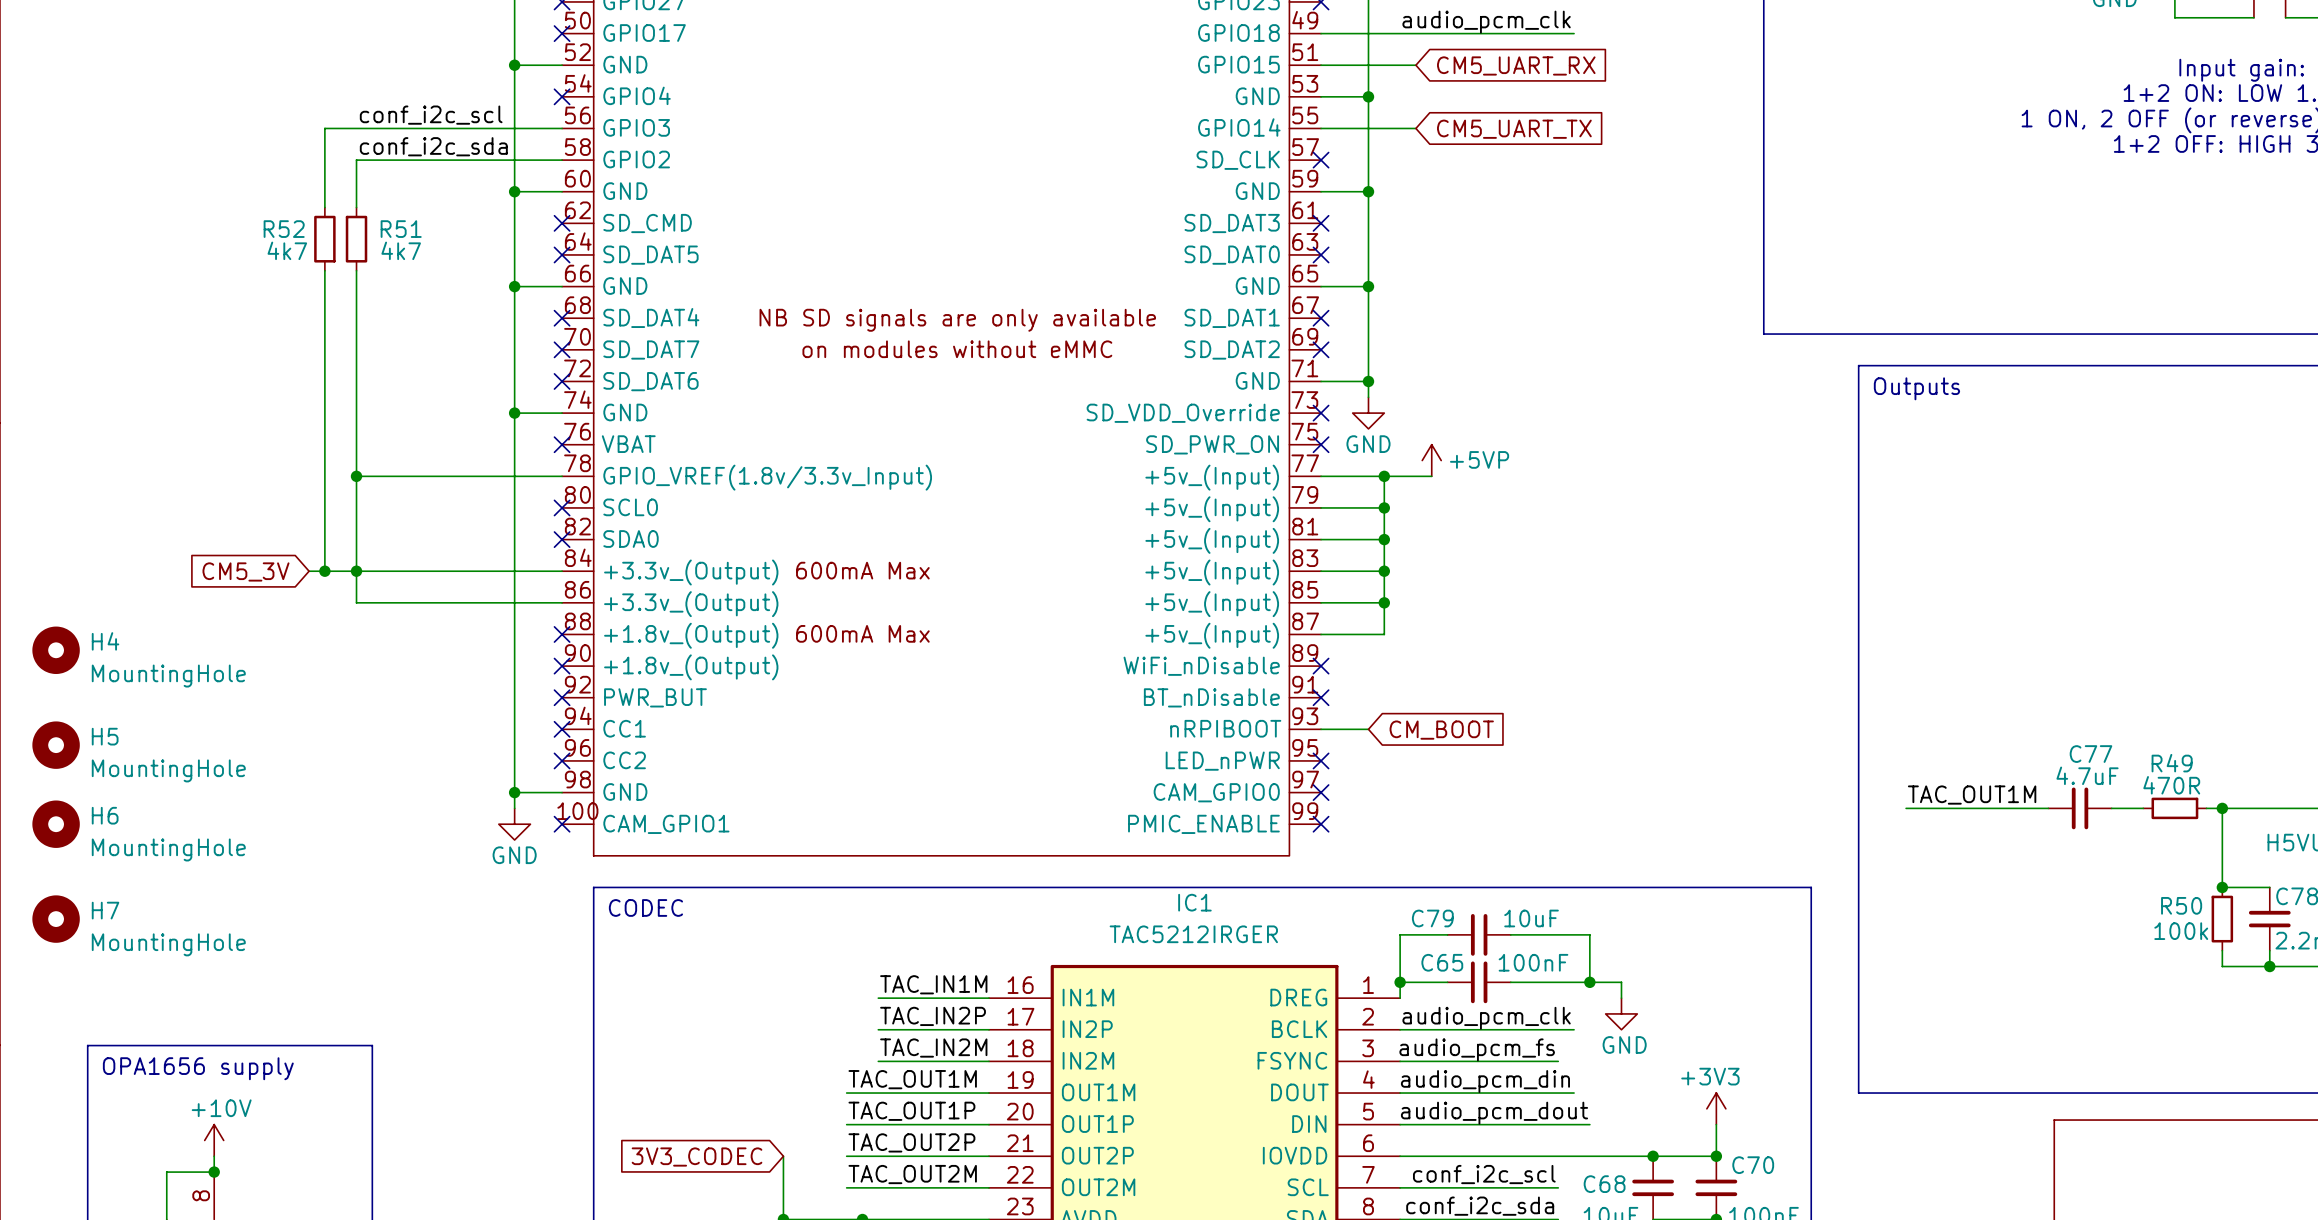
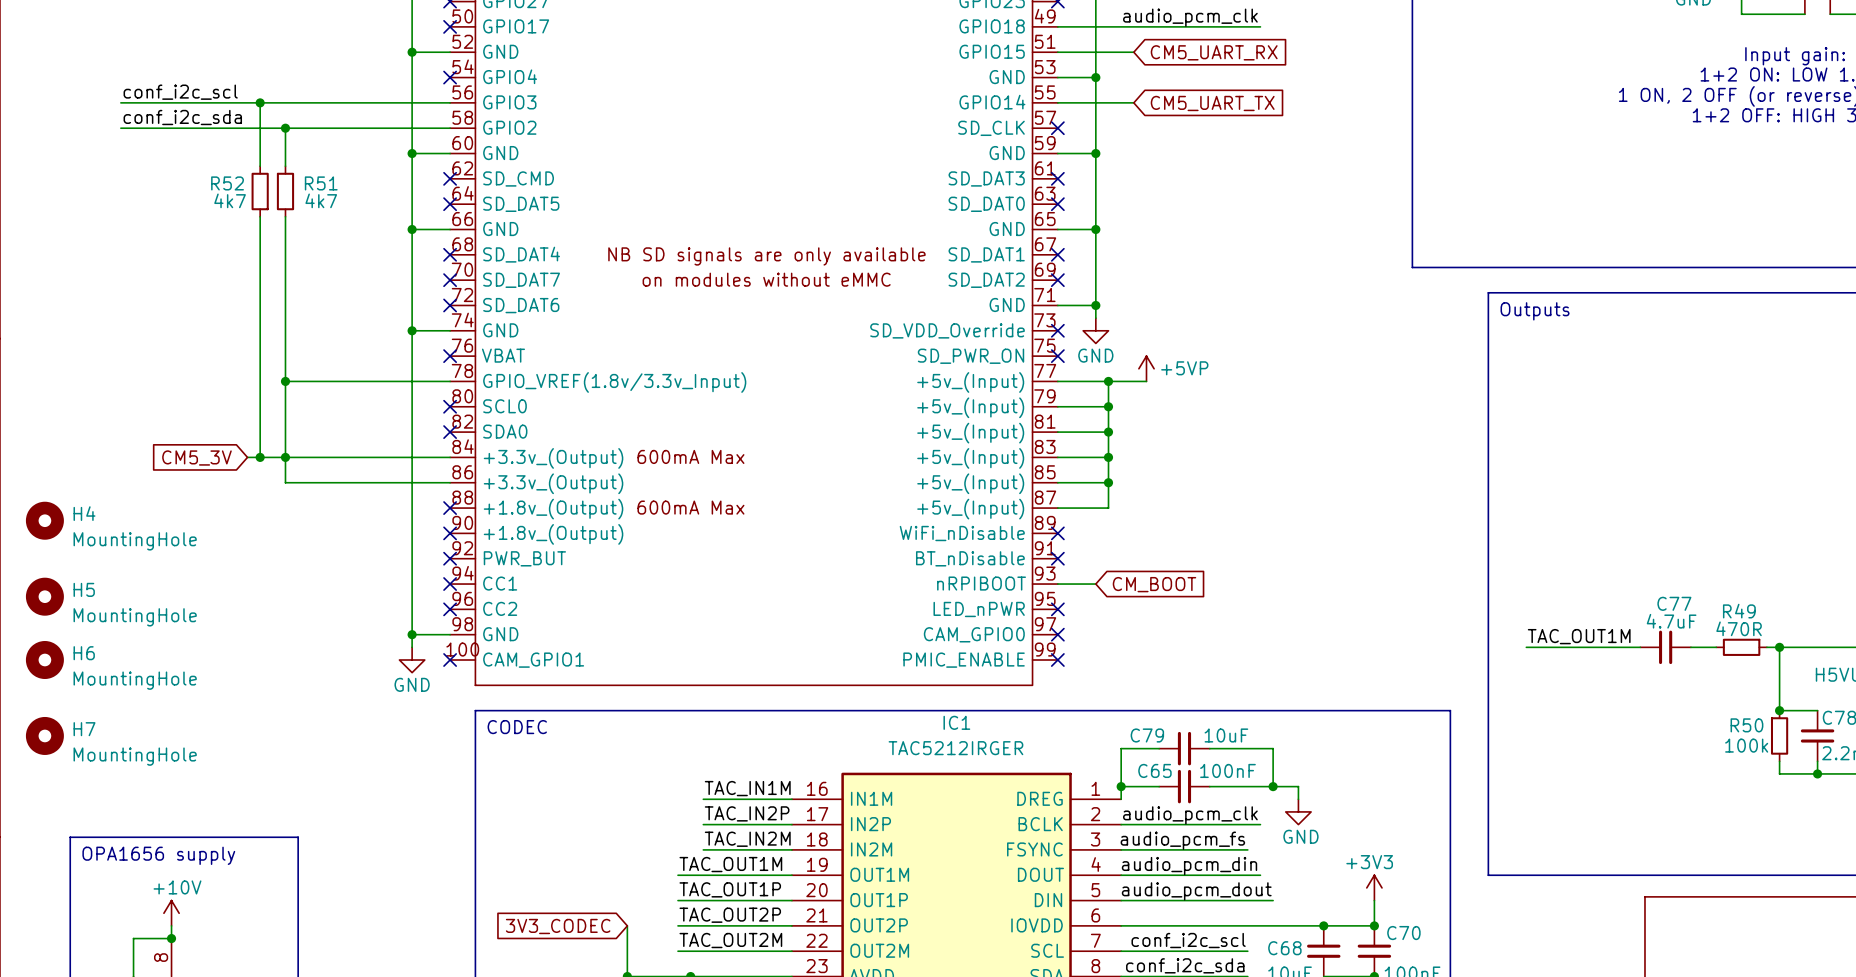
label position: conf_i2c_scl (431, 115) -> conf_i2c_scl (180, 92)
wire: none -> (120, 102) (260, 102)
junction: none -> (260, 102)
label position: conf_i2c_sda (433, 146) -> conf_i2c_sda (182, 117)
wire: none -> (120, 128) (285, 128)
junction: none -> (285, 128)

